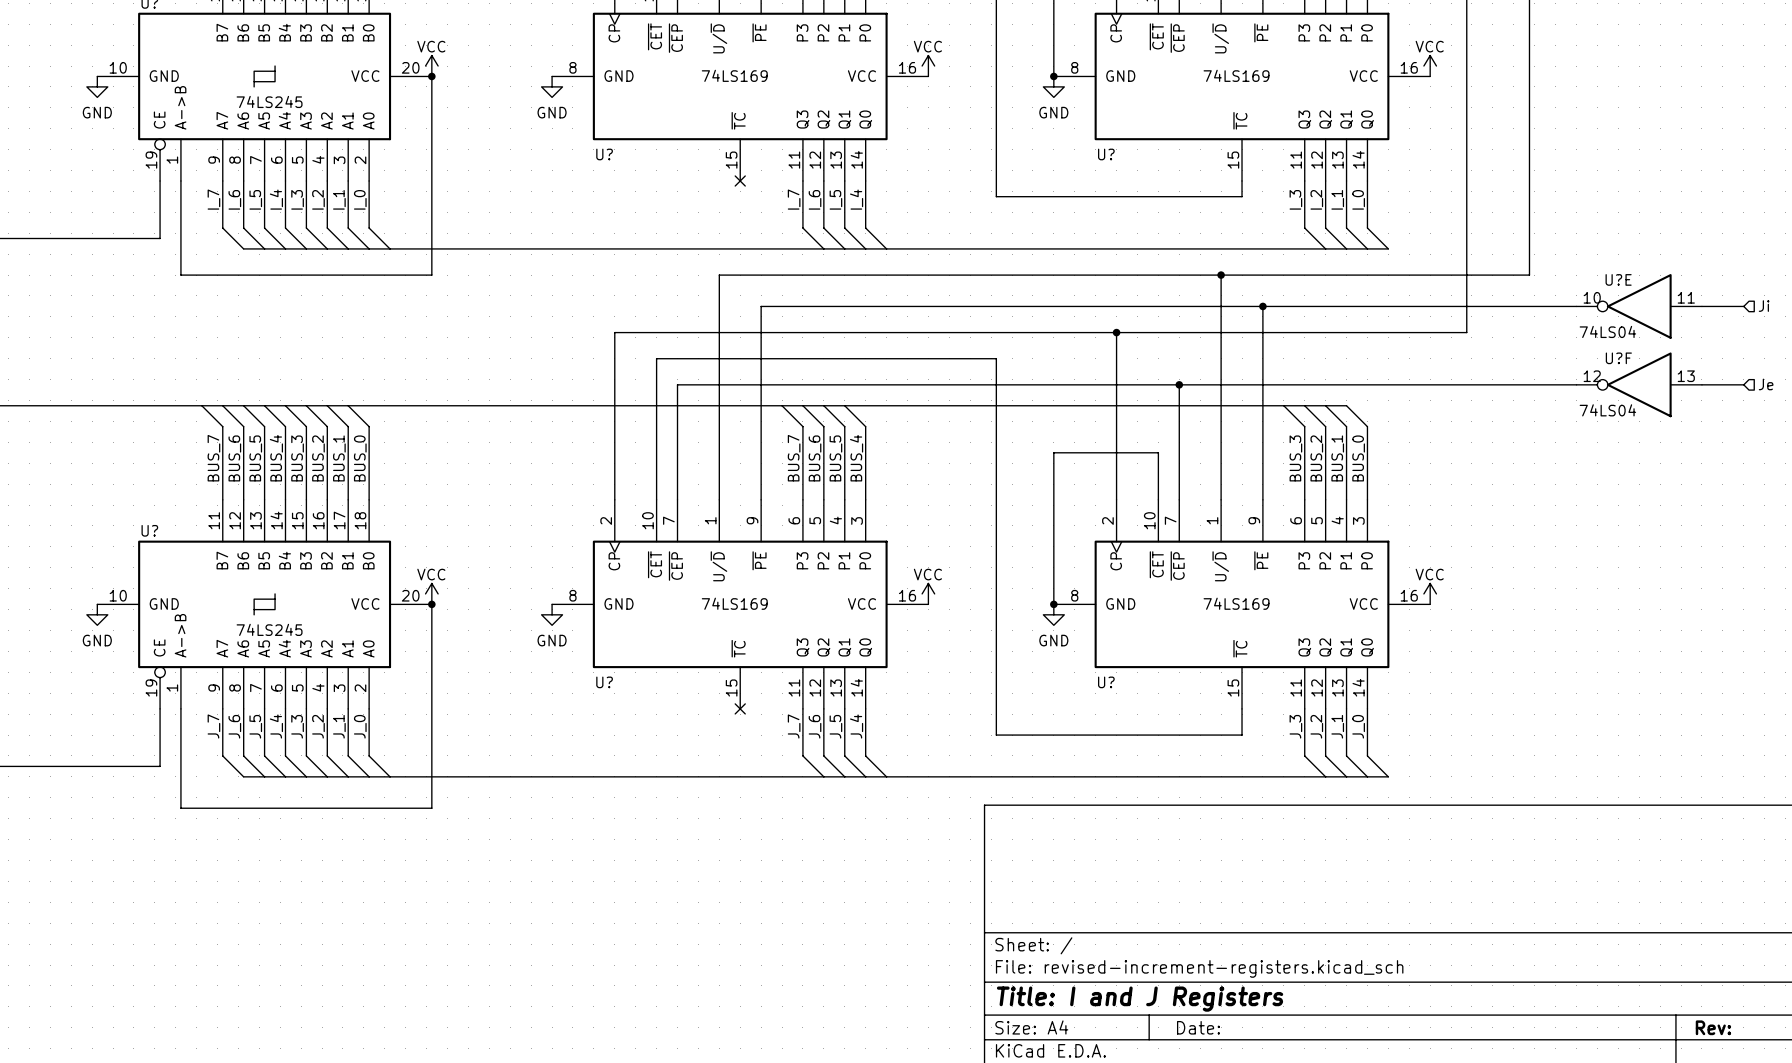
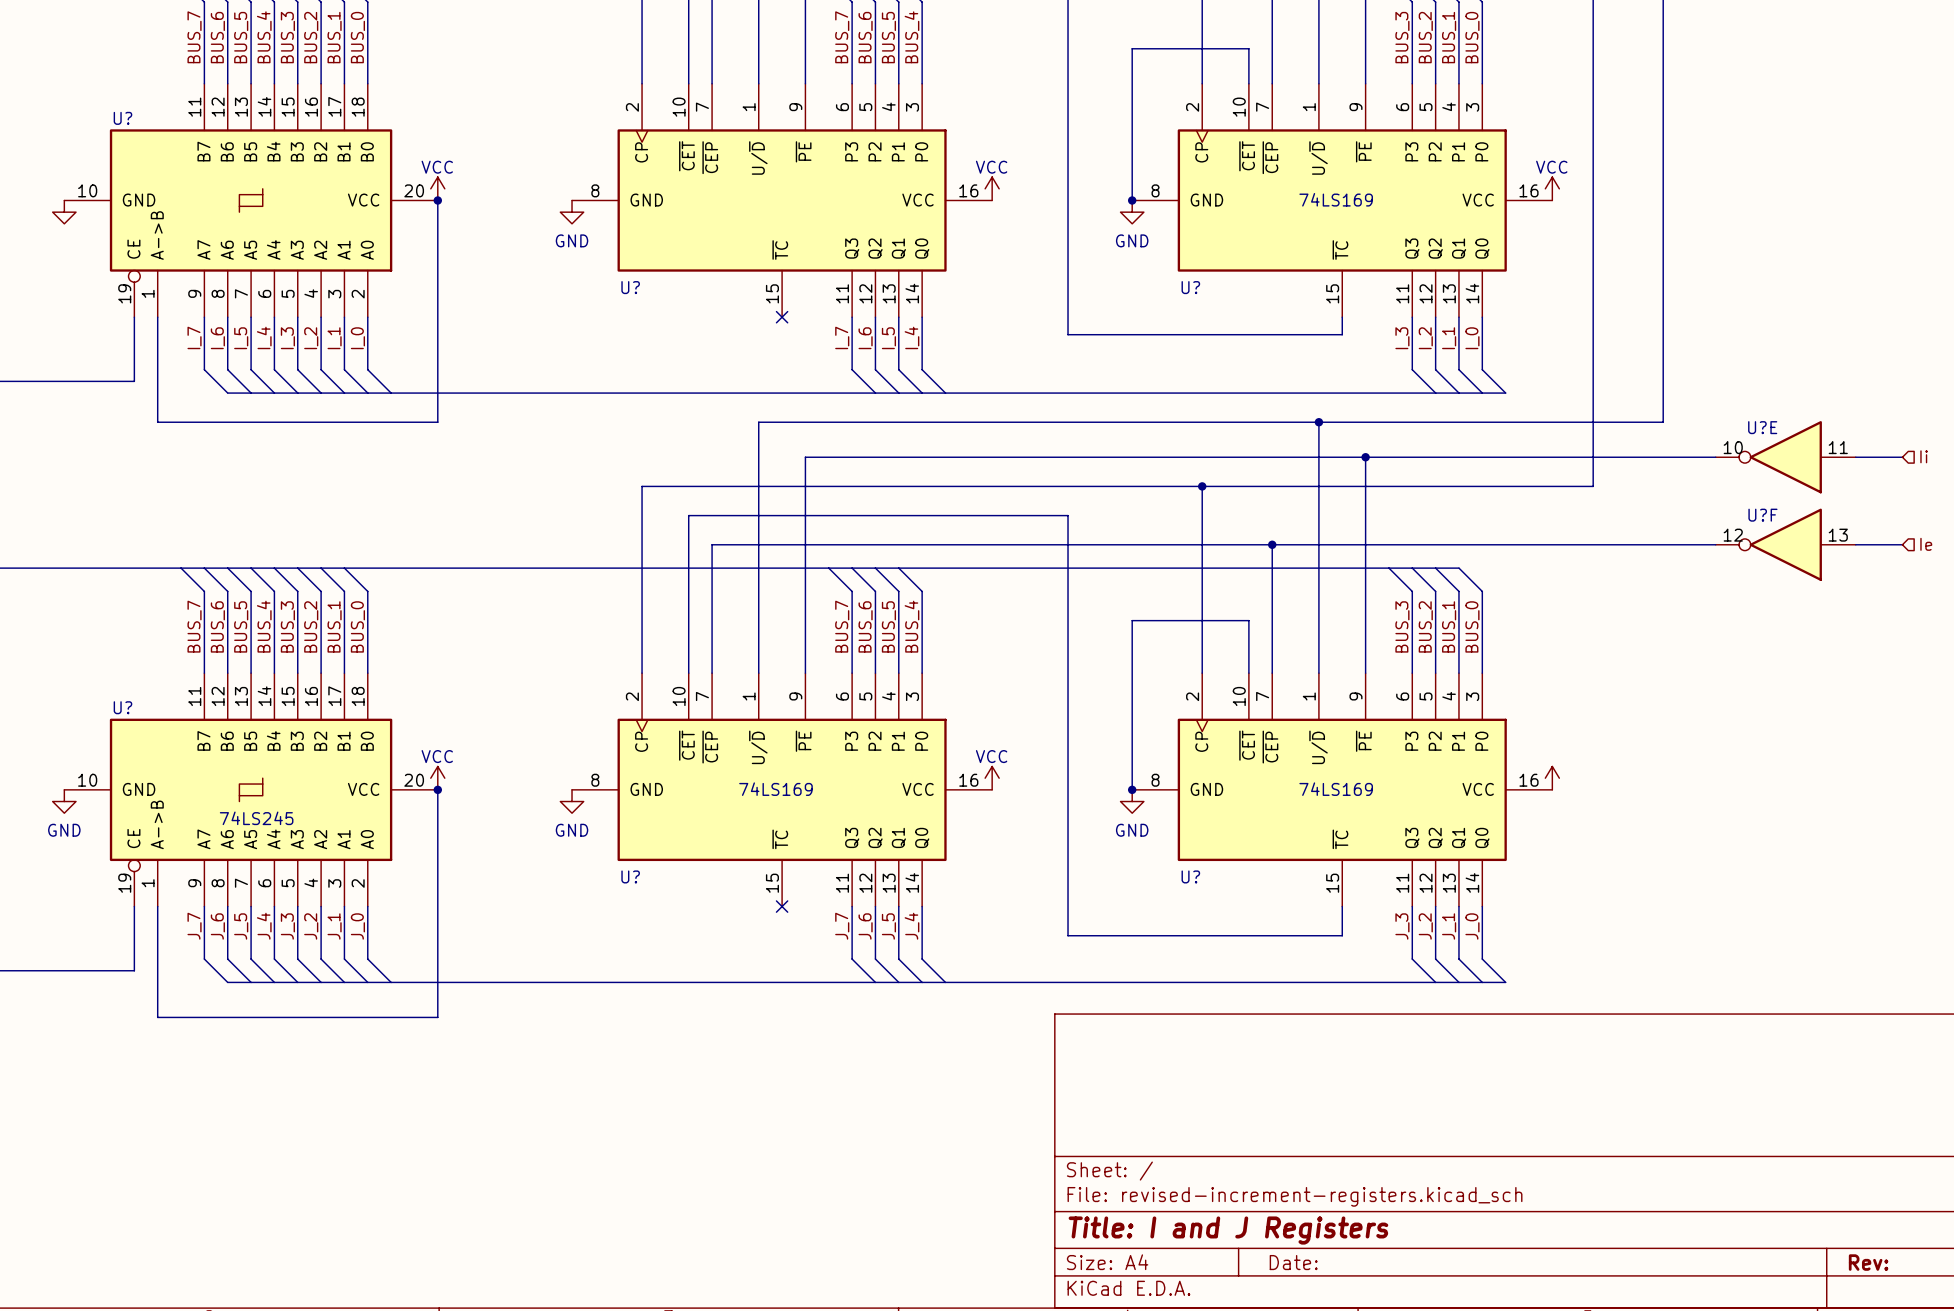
U? value: 74LS169 (734, 75) -> none
U? value: 74LS245 (269, 101) -> none
power symbol text: GND (97, 112) -> none
hierarchical label: Ji (1764, 306) -> Ii (1924, 456)
U?E value: 74LS04 (1607, 331) -> none
hierarchical label: Je (1766, 384) -> Ie (1926, 544)
U?F value: 74LS04 (1607, 410) -> none
power symbol text: VCC (1429, 574) -> none

